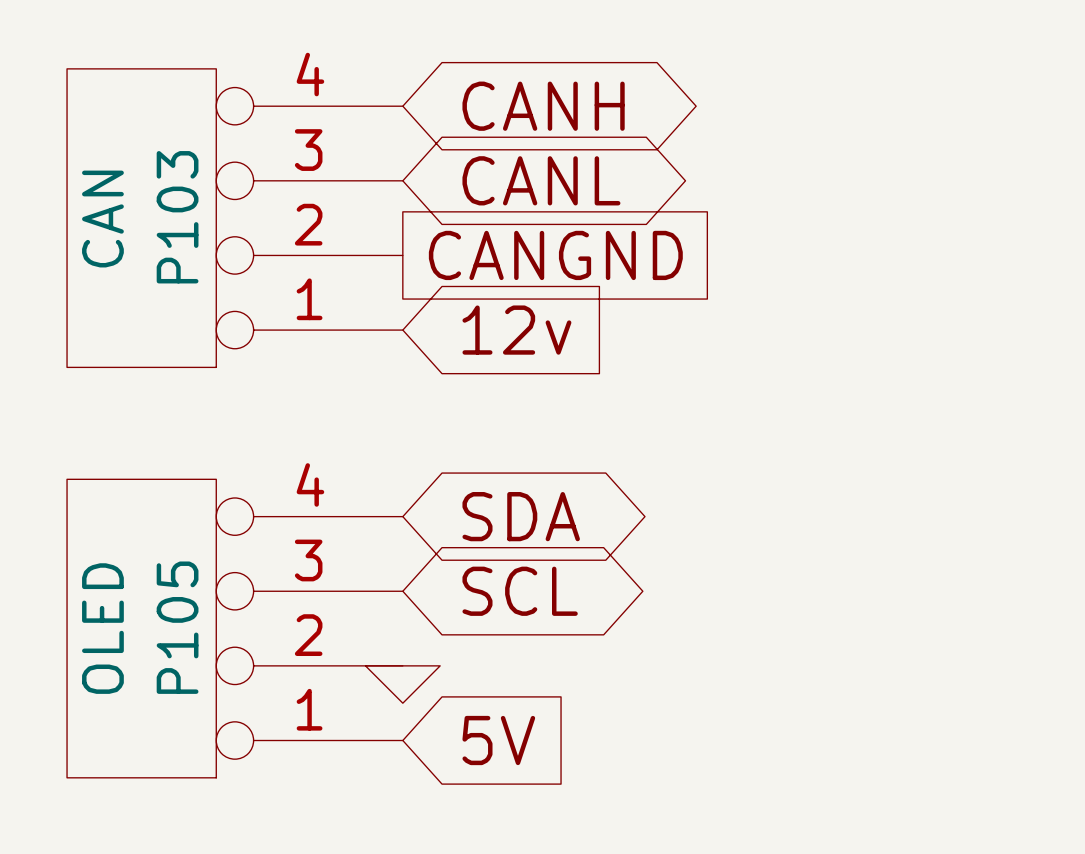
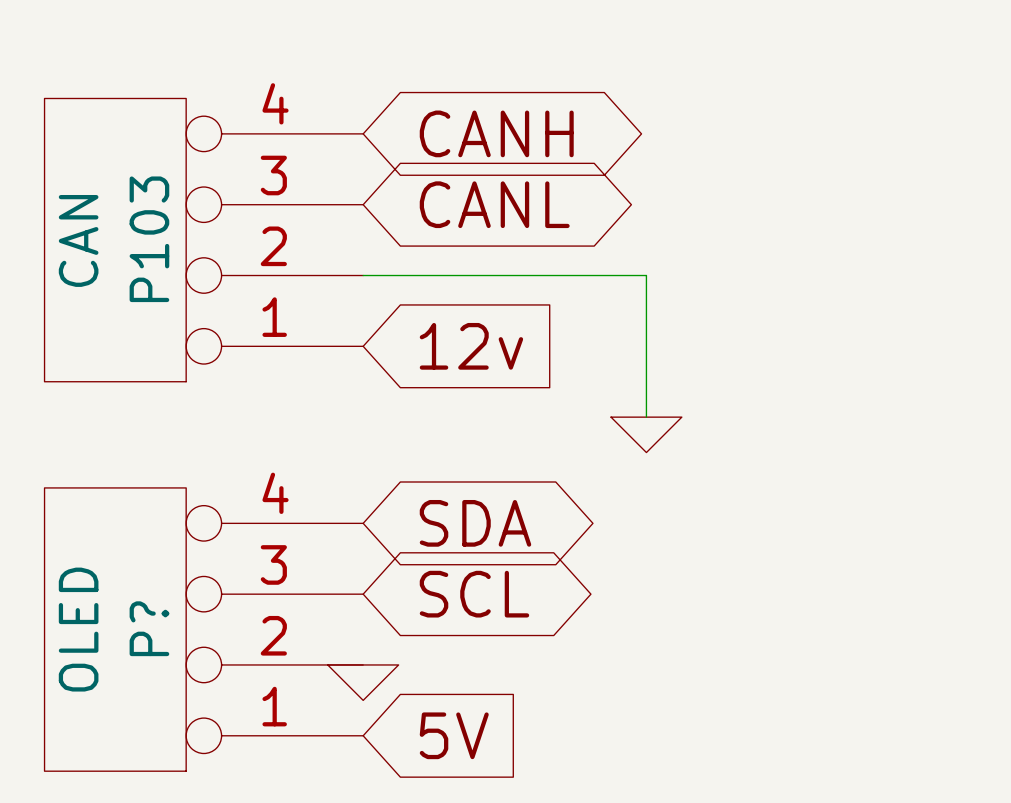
wire: none -> (363, 275) (646, 275) (646, 417)
global label: CANGND (555, 255) -> none
power symbol: none -> (646, 434)
P105 name: P105 (177, 627) -> P? (149, 628)

